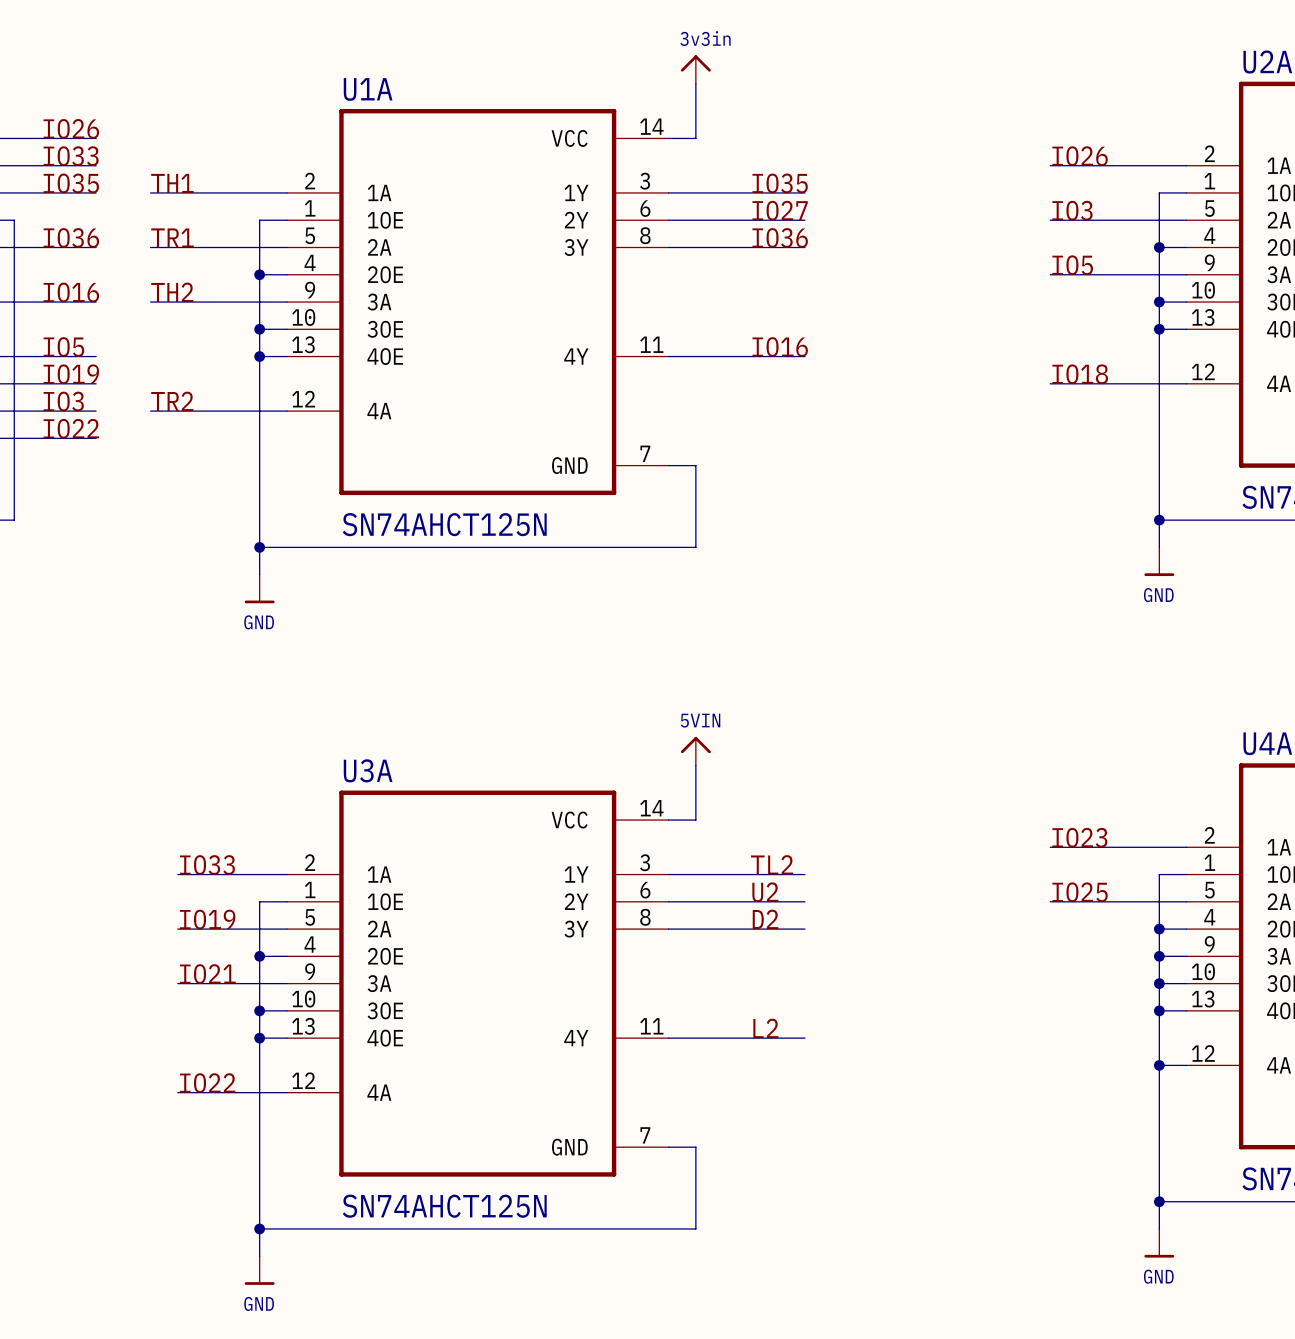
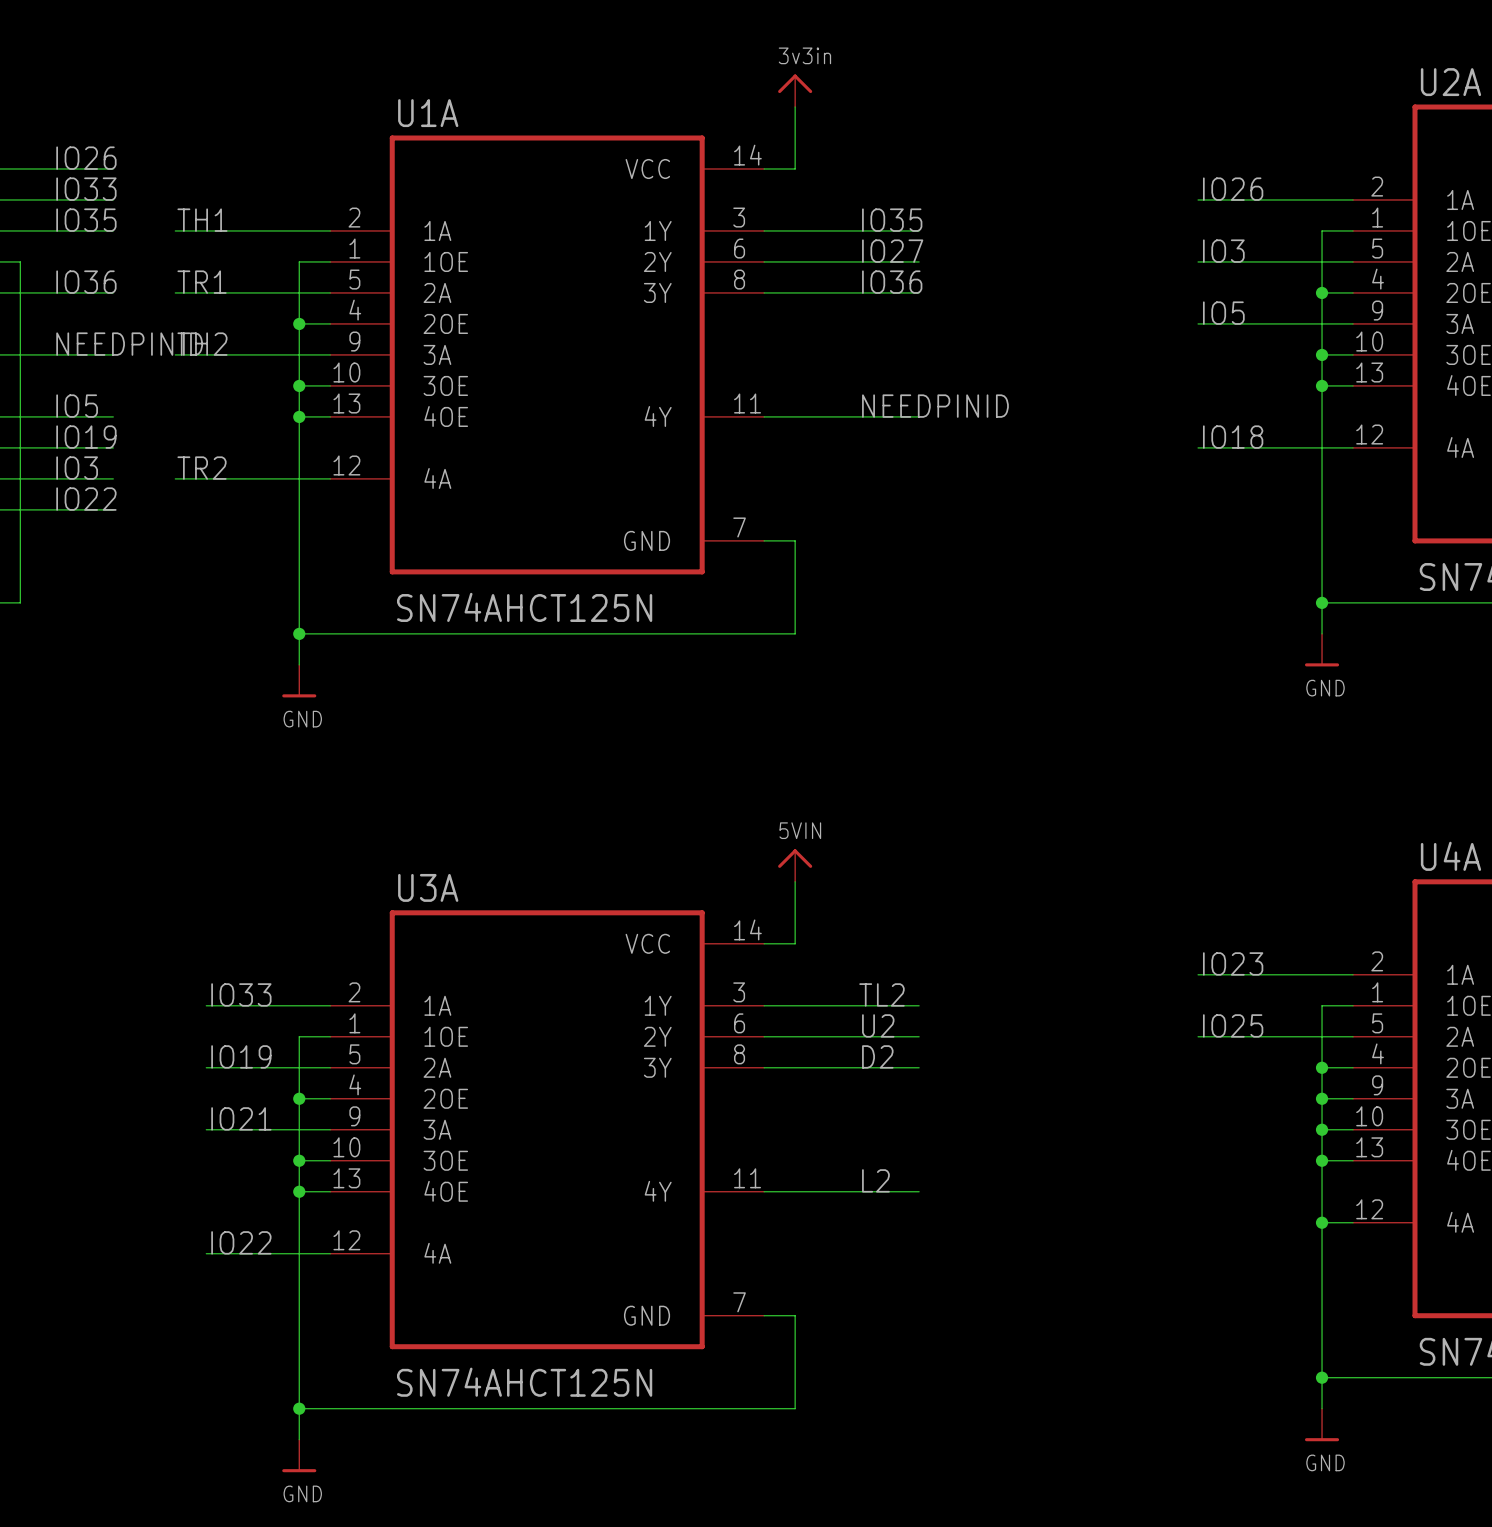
label: IO16 (71, 292) -> NEEDPINID (129, 344)
label: IO16 (780, 347) -> NEEDPINID (935, 406)

